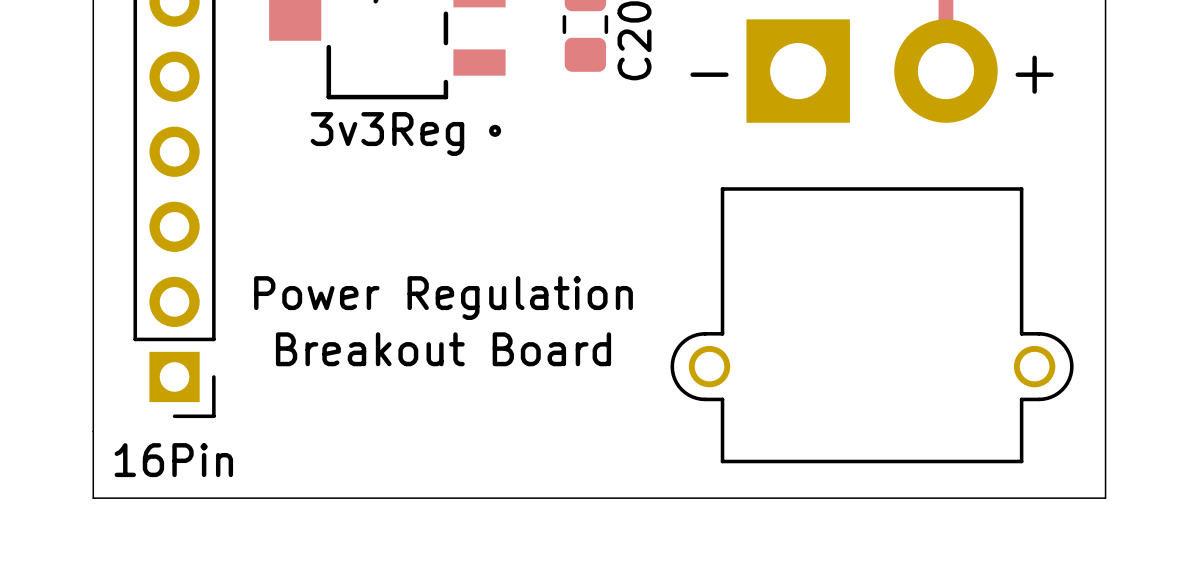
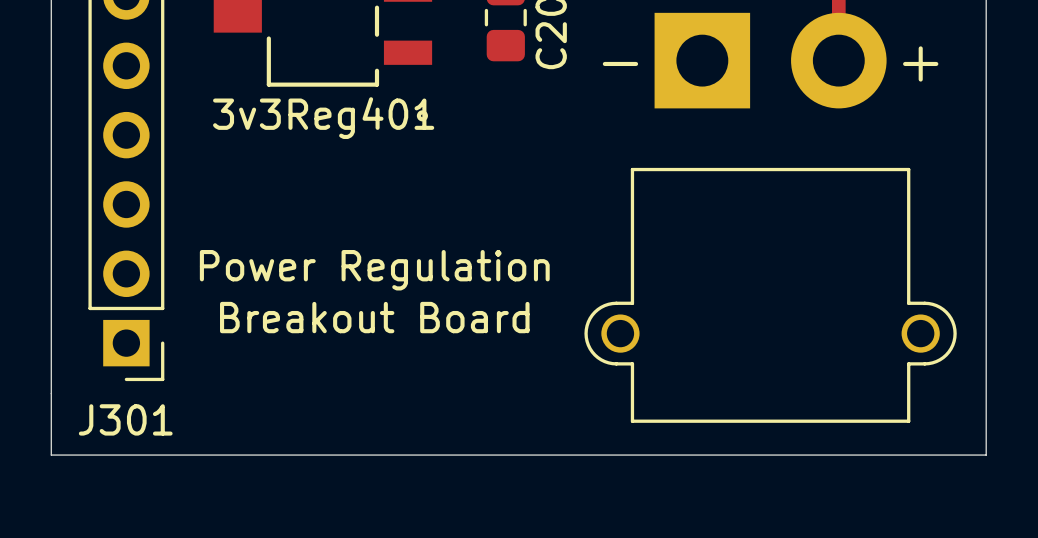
3v3Reg name: 3v3Reg (387, 134) -> 3v3Reg401 (323, 118)
16Pin name: 16Pin (173, 460) -> J301 (125, 419)

